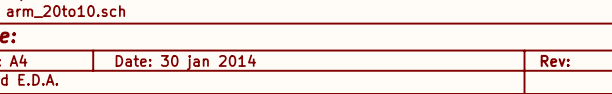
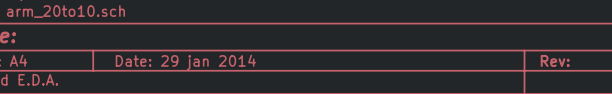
title block: Date: 30 jan 2014 (185, 62) -> Date: 29 jan 2014 (185, 62)

